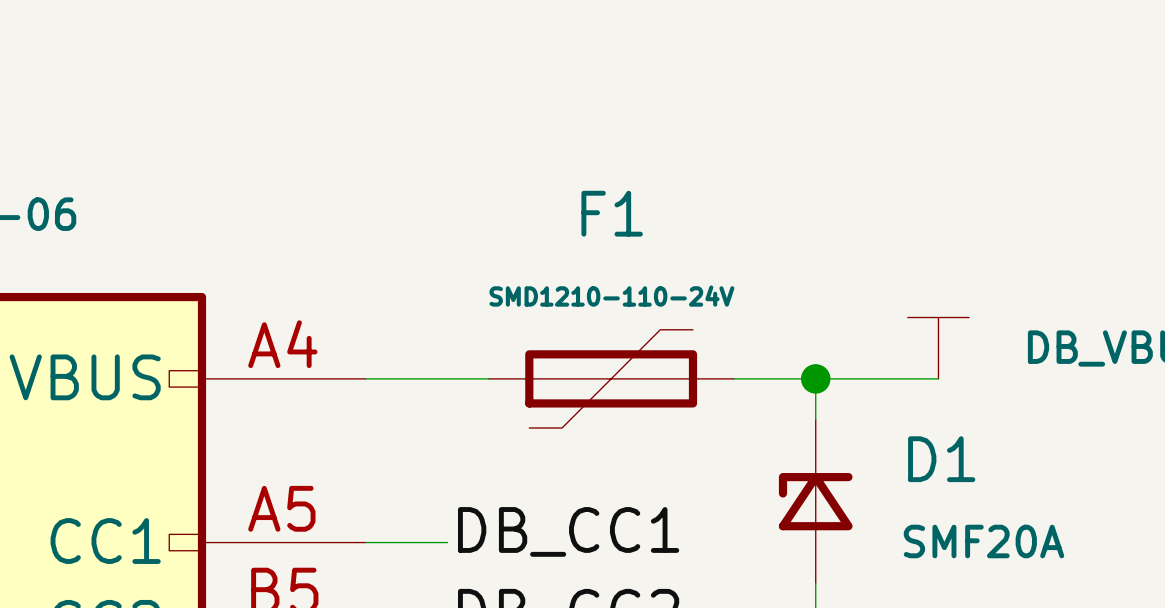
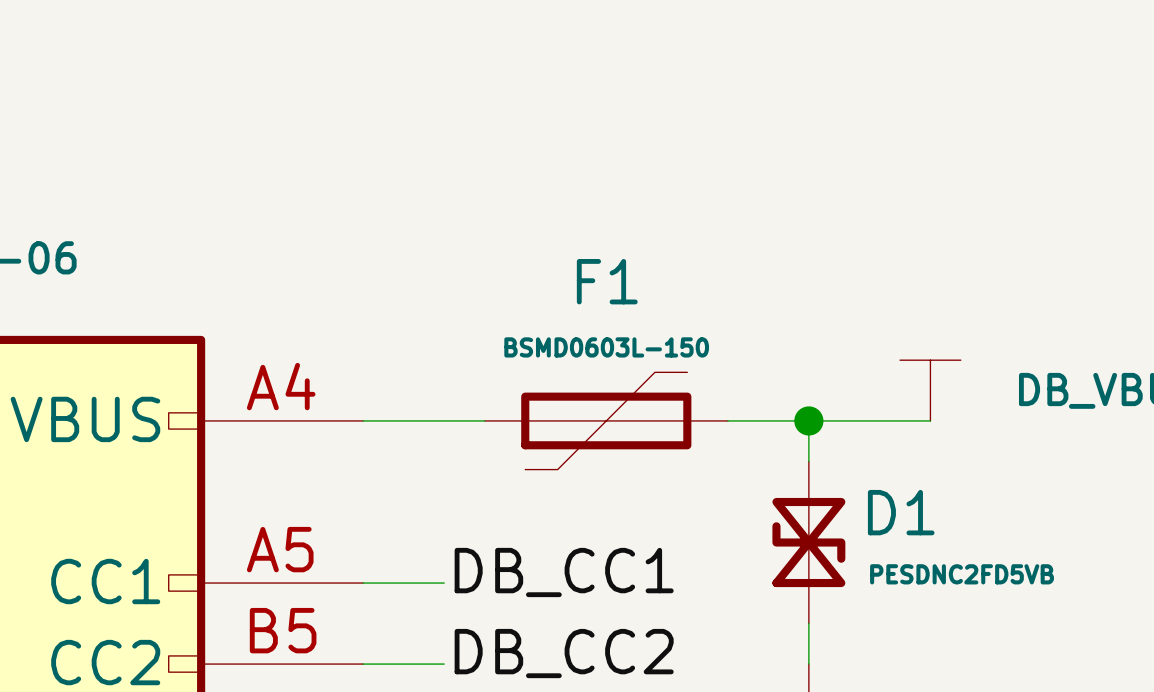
F1 name position: F1 (612, 213) -> F1 (607, 281)
F1 value: SMD1210-110-24V (611, 296) -> BSMD0603L-150 (606, 347)
D1 symbol: [778, 419, 853, 584] -> [772, 461, 846, 624]
D1 name position: D1 (941, 459) -> D1 (901, 512)
D1 value: SMF20A (983, 541) -> PESDNC2FD5VB (962, 574)

